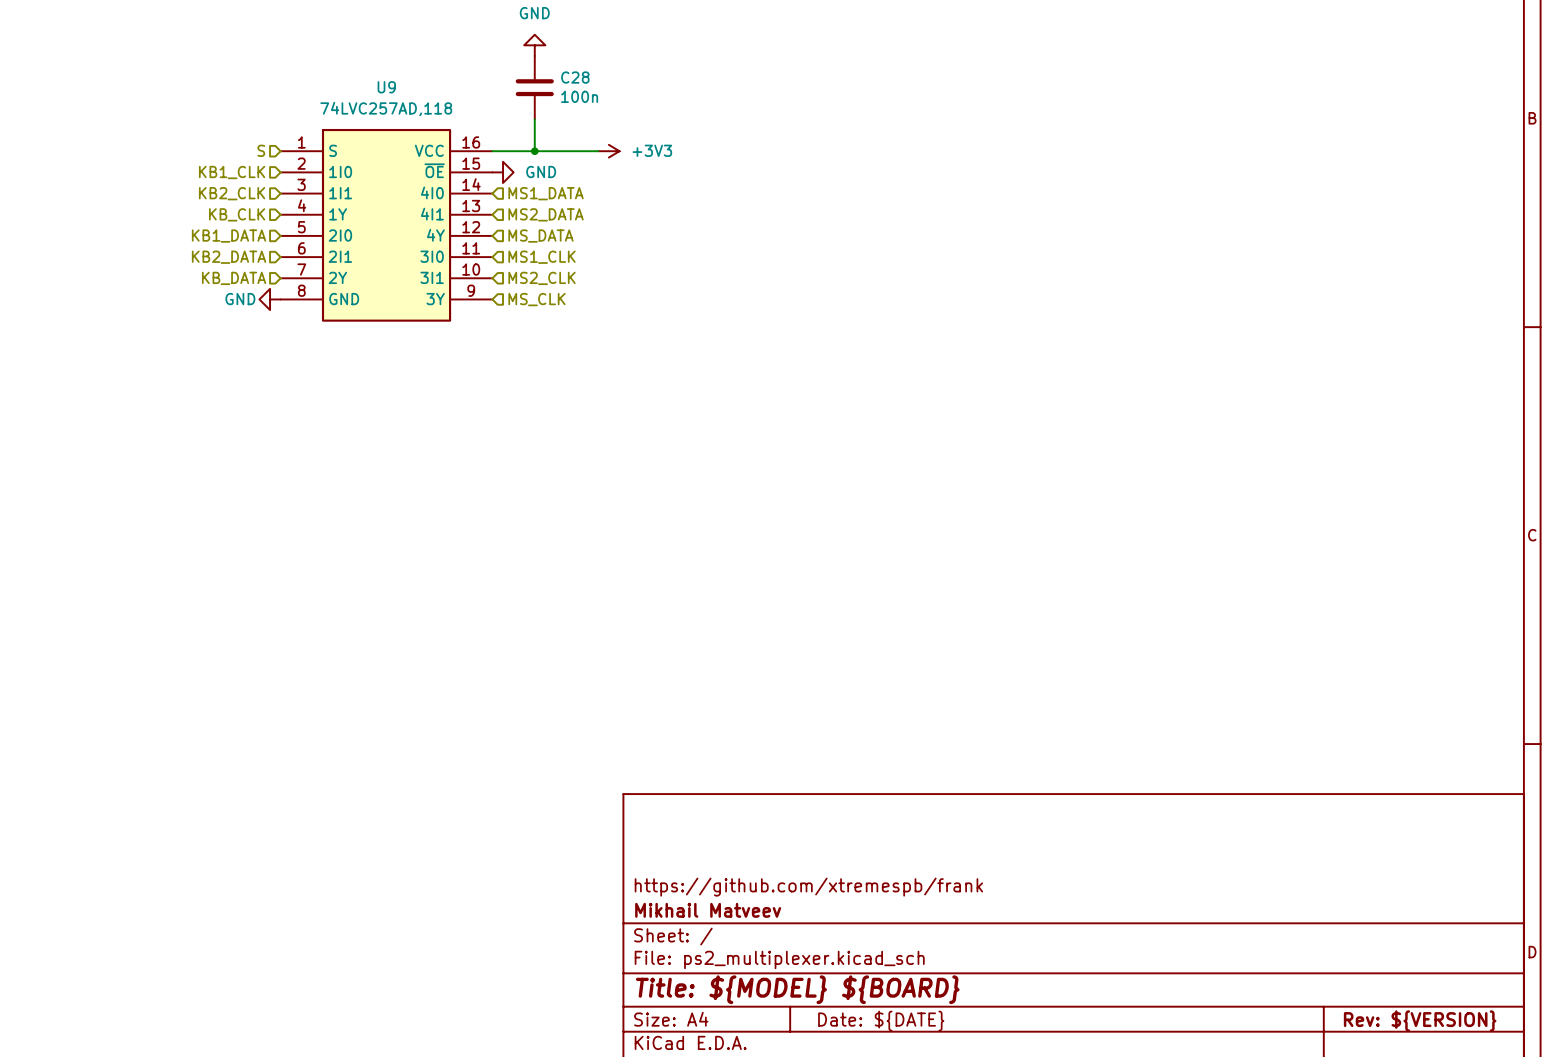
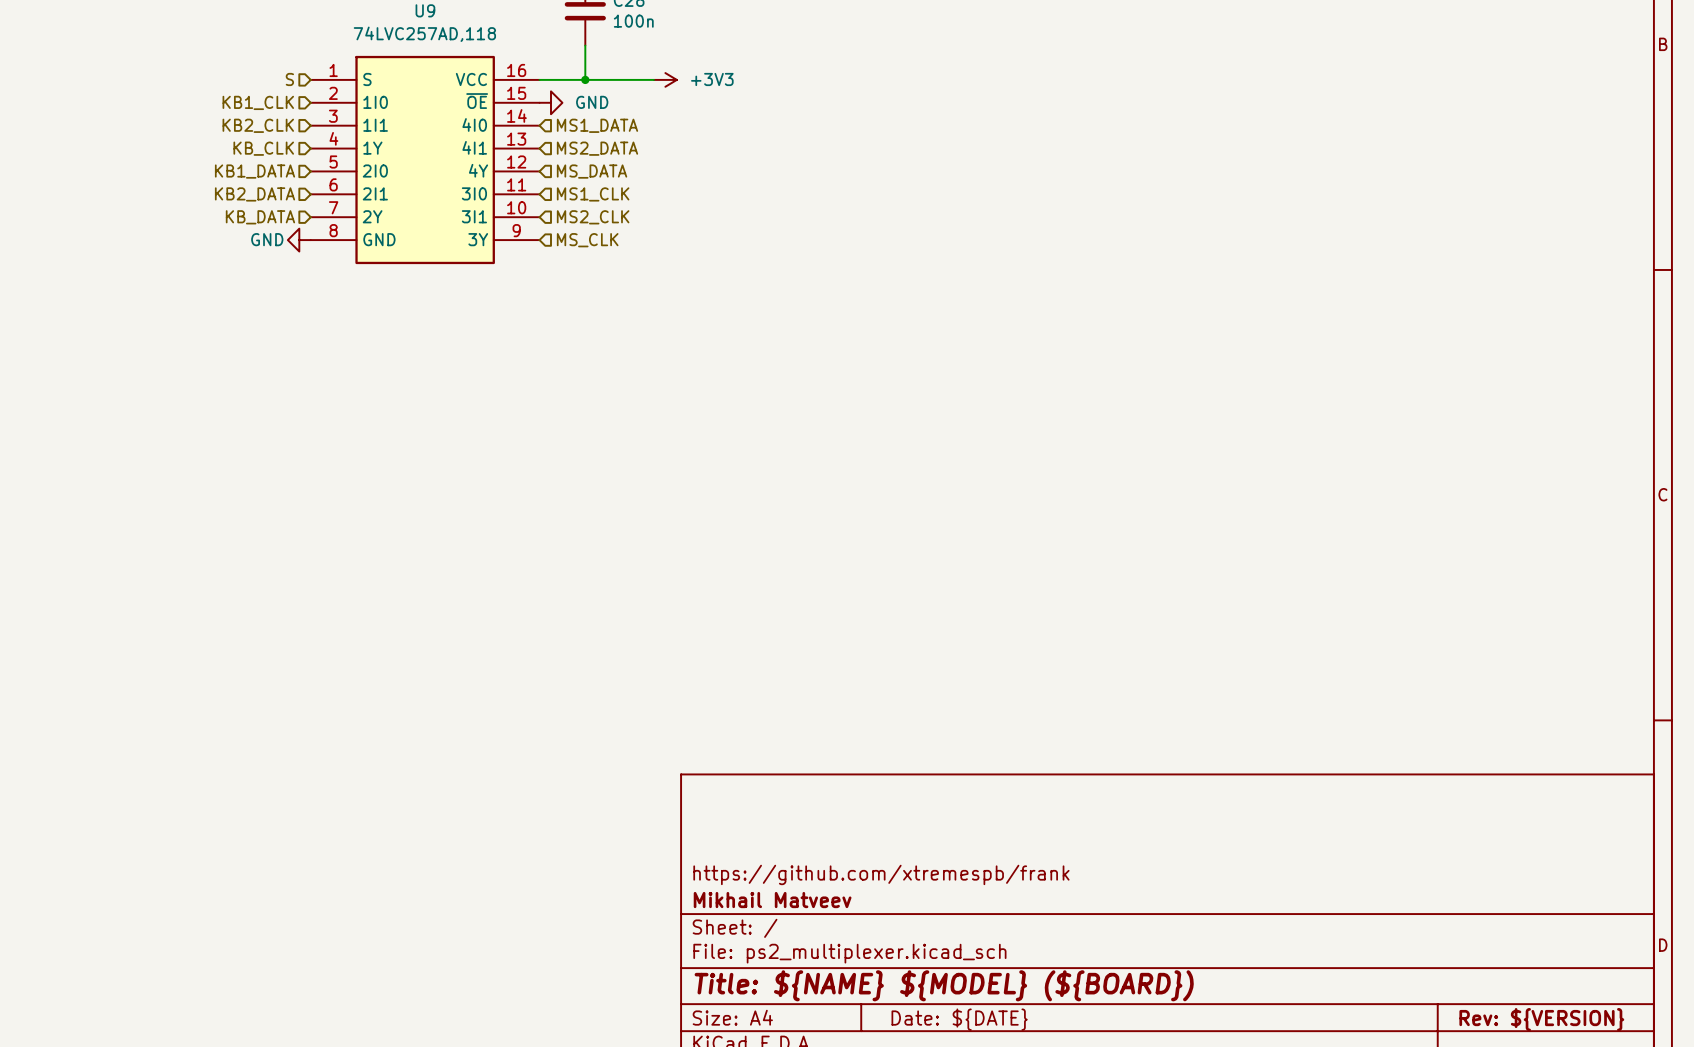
title block: Title: ${MODEL} ${BOARD} (797, 989) -> Title: ${NAME} ${MODEL} (${BOARD}) (944, 985)

